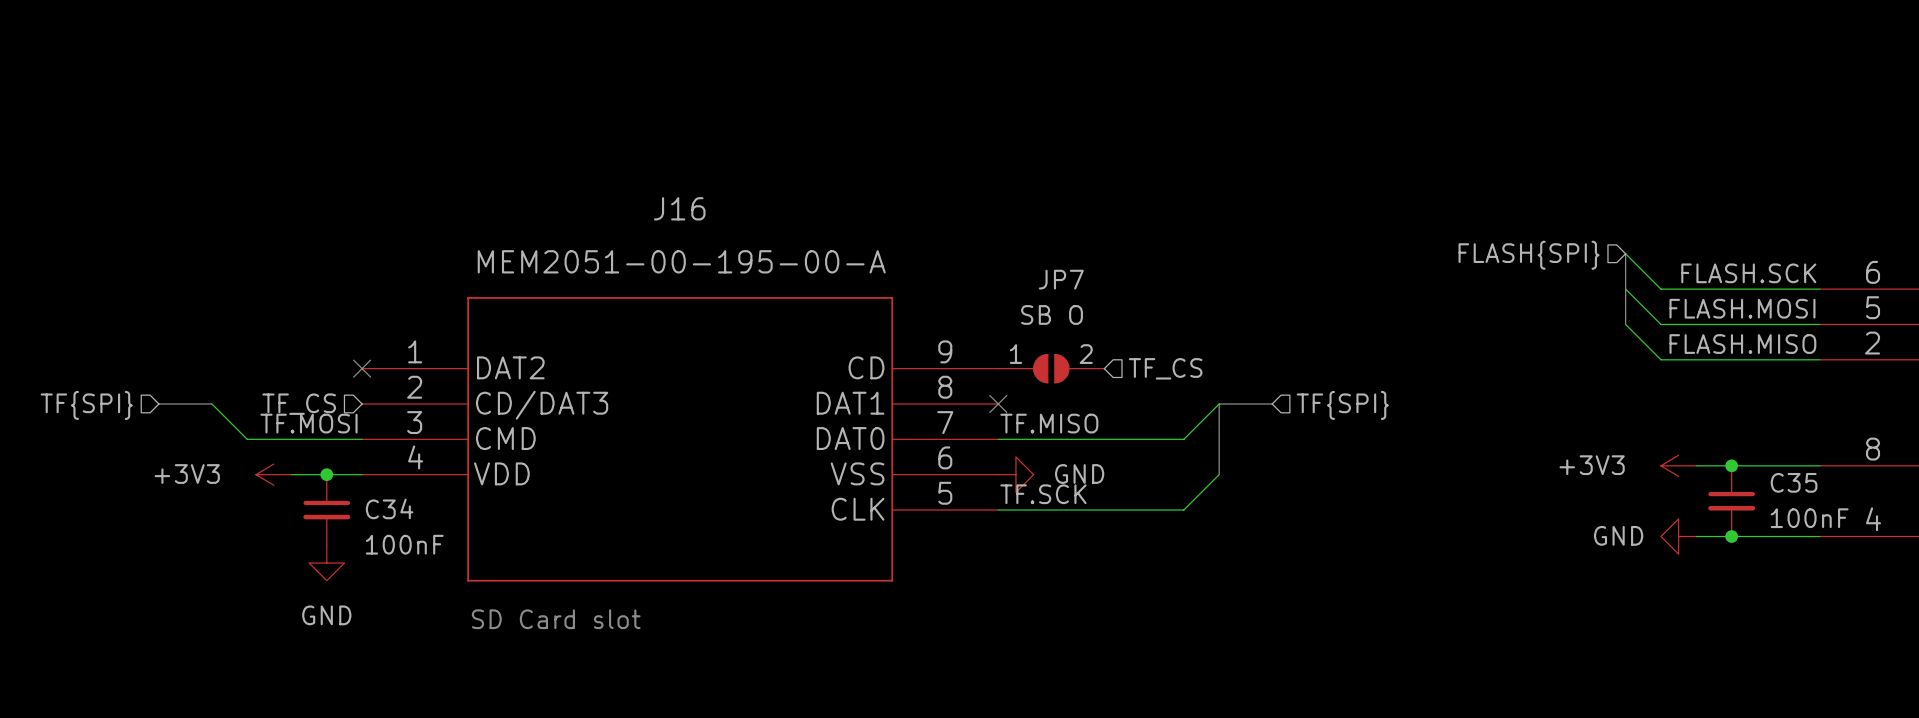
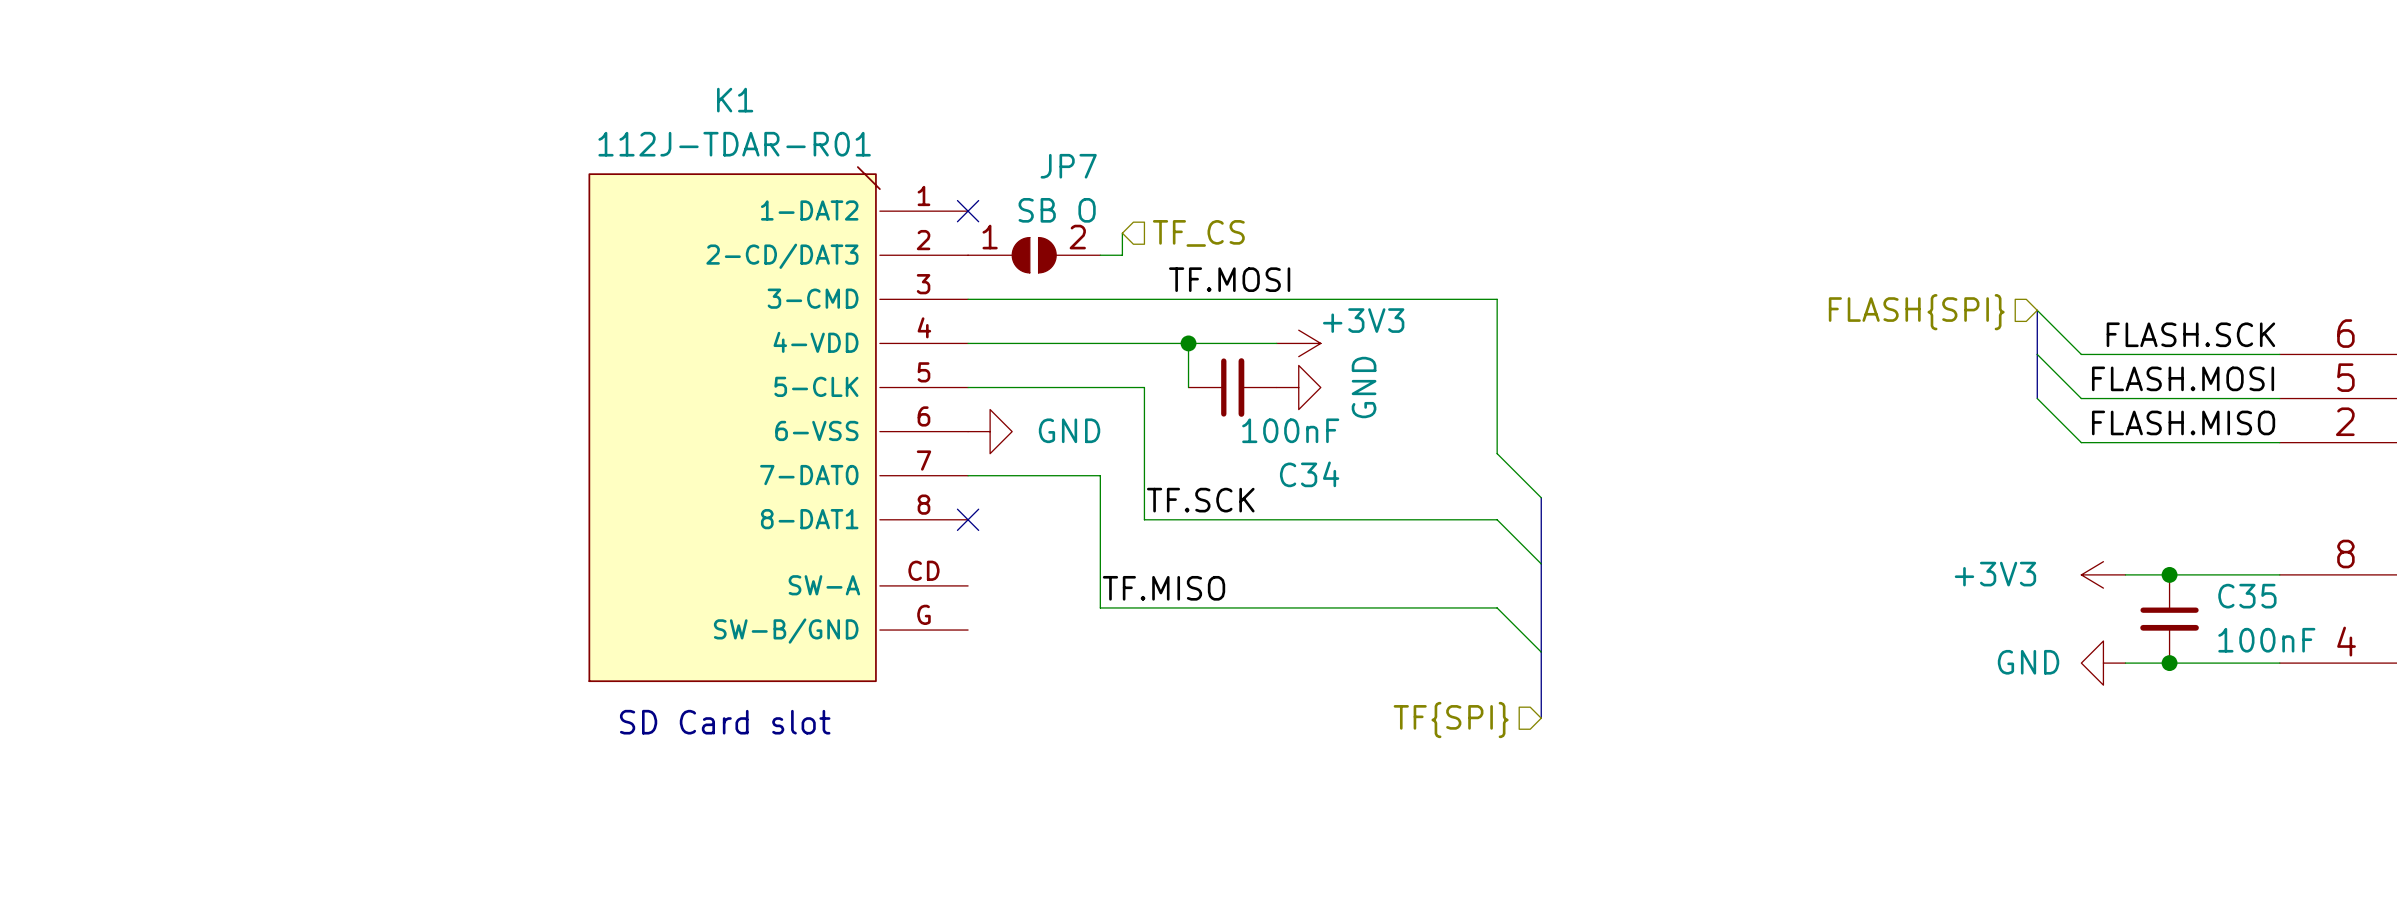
no-connect mark: none -> (968, 211)
wire: none -> (1122, 233) (1122, 255) (1100, 255)
label: none -> TF.MOSI (1229, 279)
wire: none -> (968, 299) (1497, 299) (1497, 453) (1541, 497)
JP7 name position: JP7 (1061, 279) -> JP7 (1068, 166)
wire: none -> (968, 343) (1276, 343)
wire: none -> (1188, 343) (1188, 387)
junction: none -> (1188, 343)
power symbol: none -> +3V3 (1298, 343)
JP7 value position: SB O (1052, 314) -> SB O (1057, 210)
wire: none -> (968, 387) (1144, 387) (1144, 519) (1497, 519) (1541, 563)
power symbol: none -> GND (1298, 387)
K1: none -> 112J-TDAR-R01 (778, 424)
power symbol: none -> GND (990, 431)
no-connect mark: (362, 368) -> none
JP7 position: (1051, 368) -> (1034, 255)
hierarchical label position: TF_CS (1165, 368) -> TF_CS (1198, 233)
wire: none -> (968, 475) (1100, 475) (1100, 607) (1497, 607) (1541, 652)
bus: (158, 403) (211, 403) -> none
wire: (211, 403) (247, 439) (362, 439) -> none
no-connect mark: (998, 403) -> none
wire: (1219, 403) (1183, 439) -> none
bus: none -> (1541, 497) (1541, 718)
bus: (1272, 403) (1219, 403) (1219, 474) -> none
hierarchical label: TF_CS (299, 404) -> none
hierarchical label: TF{SPI} (86, 405) -> none
hierarchical label rotation: 0° (1342, 405) -> 180° (1451, 720)
hierarchical label position: TF{SPI} (1342, 405) -> TF{SPI} (1451, 720)
no-connect mark: none -> (968, 519)
label: TF.MOSI (308, 423) -> none
label position: TF.MISO (1049, 423) -> TF.MISO (1164, 588)
J16: MEM2051-00-195-00-A (680, 439) -> none
wire: (998, 439) (1183, 439) -> none
power symbol: +3V3 (273, 474) -> none
wire: (291, 474) (362, 474) -> none
junction: (326, 474) -> none
power symbol: GND (1015, 474) -> none
wire: (1219, 474) (1183, 510) -> none
label position: TF.SCK (1043, 494) -> TF.SCK (1200, 500)
C34 name position: C34 (389, 508) -> C34 (1309, 474)
C34 rotation: 0° (326, 510) -> 90° counterclockwise (1232, 387)
C34 position: (326, 510) -> (1232, 387)
wire: (998, 510) (1183, 510) -> none
C34 value position: 100nF (404, 544) -> 100nF (1290, 430)
power symbol: GND (326, 563) -> none
text position: SD Card slot (556, 619) -> SD Card slot (725, 722)

